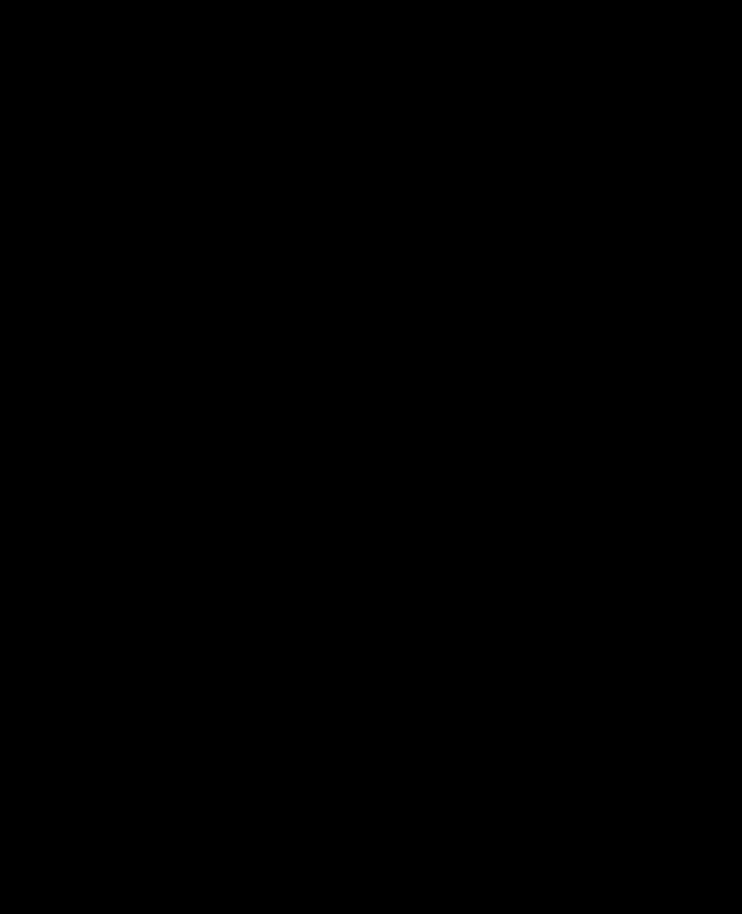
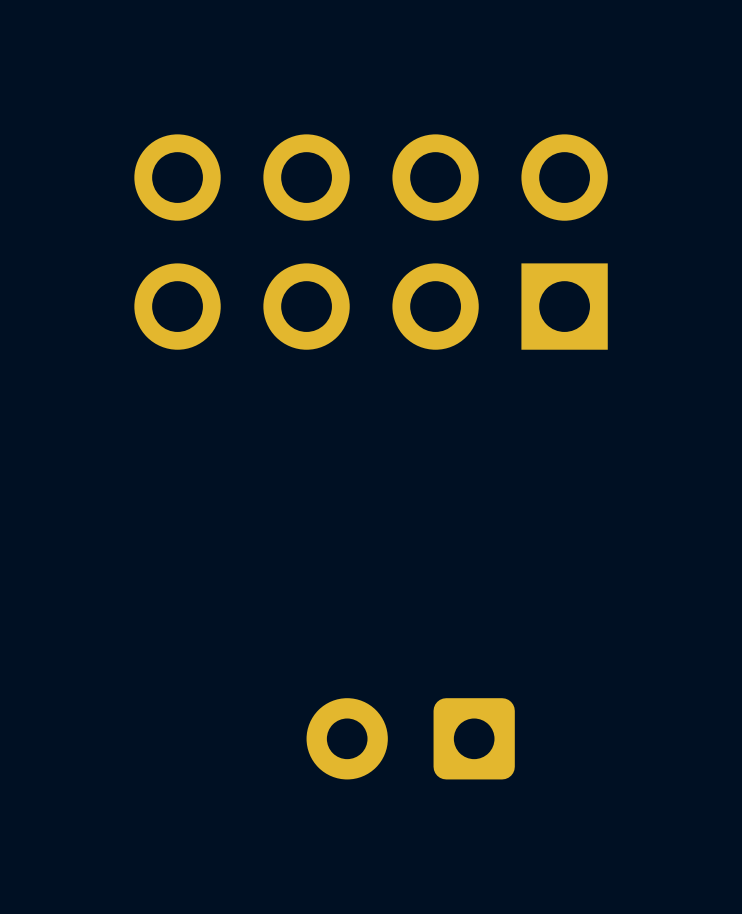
part: none -> (371, 242)
part: none -> (410, 738)

